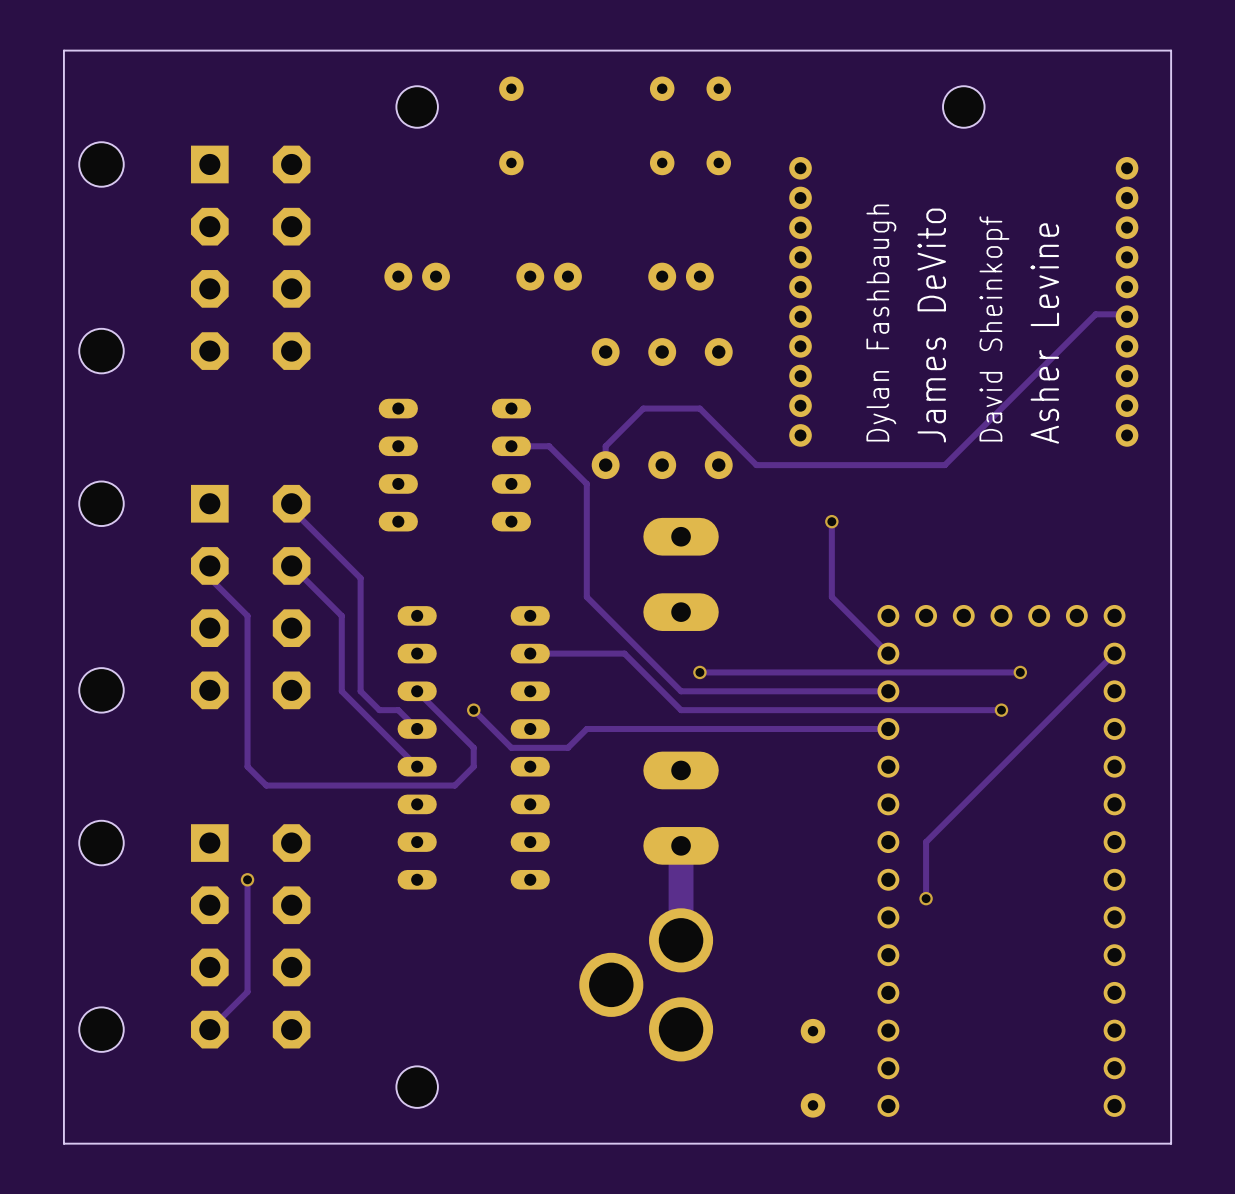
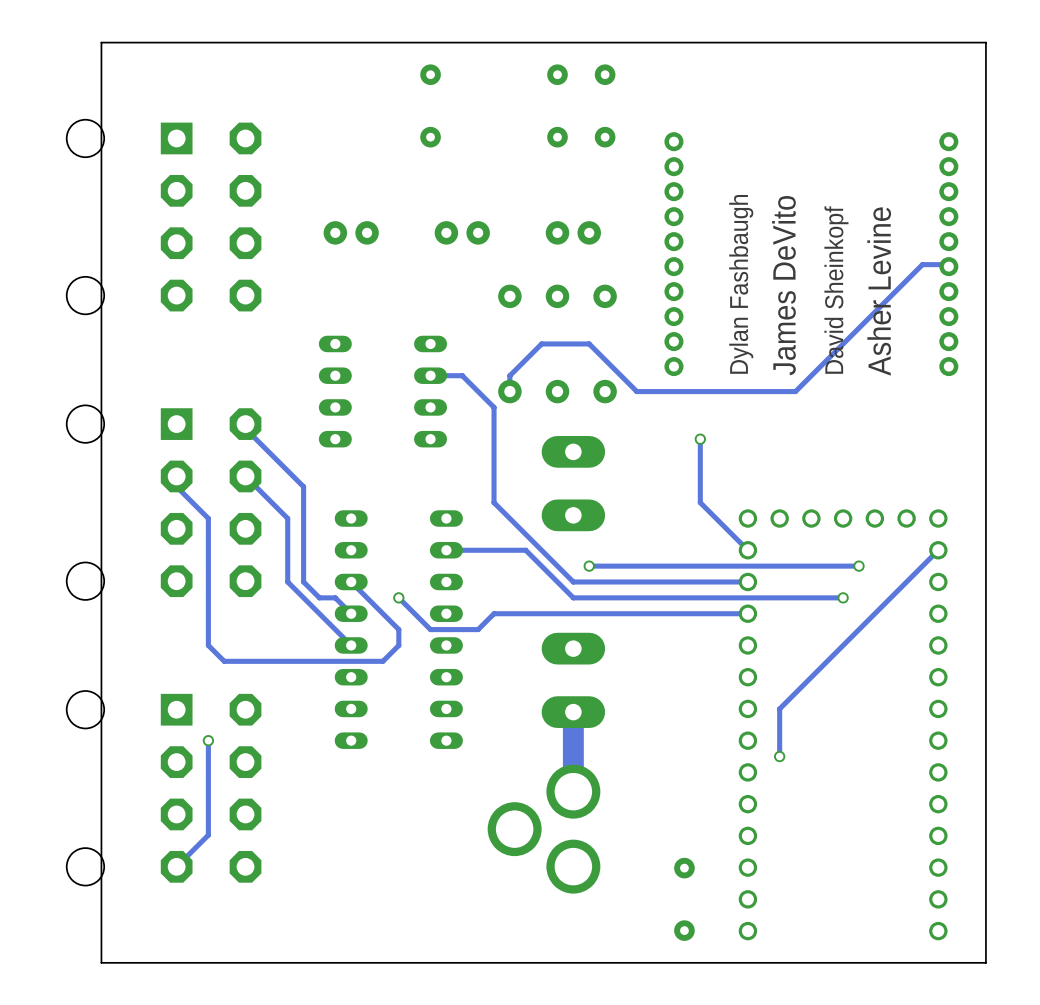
board edge: (120, 50) (63, 50) (63, 1143) (120, 1143) -> (101, 42) (101, 962)
hole: (417, 106) -> none
hole: (963, 106) -> none
hole: (417, 1087) -> none

